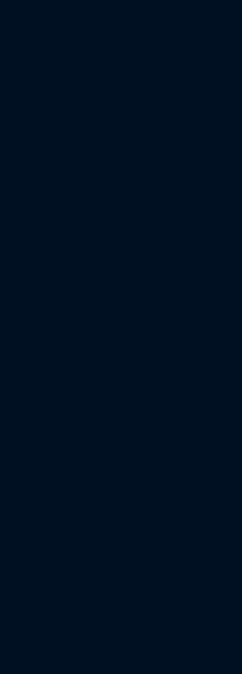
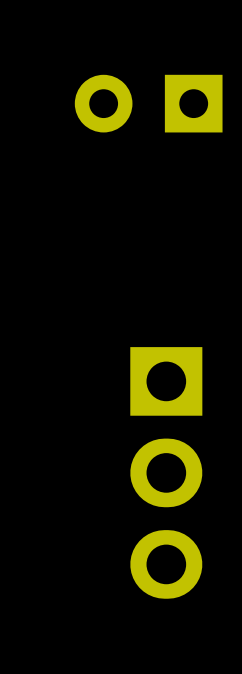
part: none -> (148, 103)
part: none -> (166, 472)

